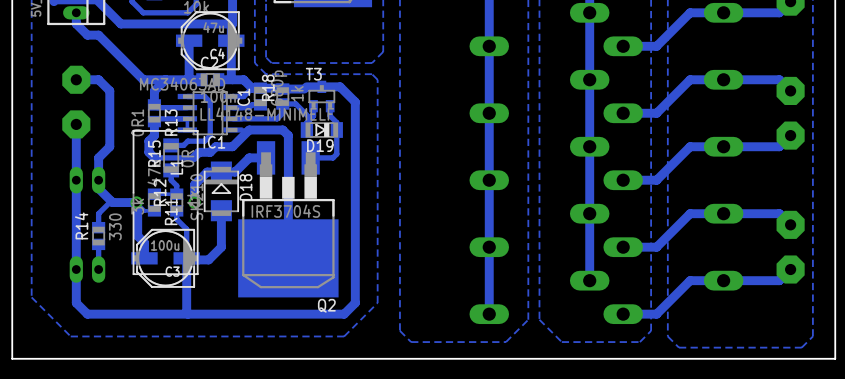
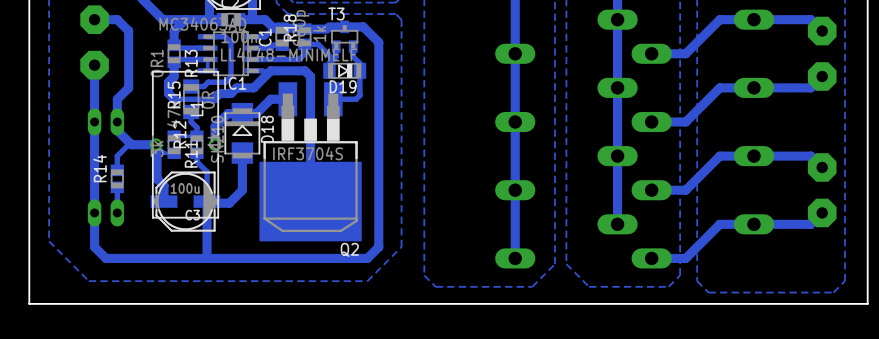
R14 value: 330 (115, 226) -> none

